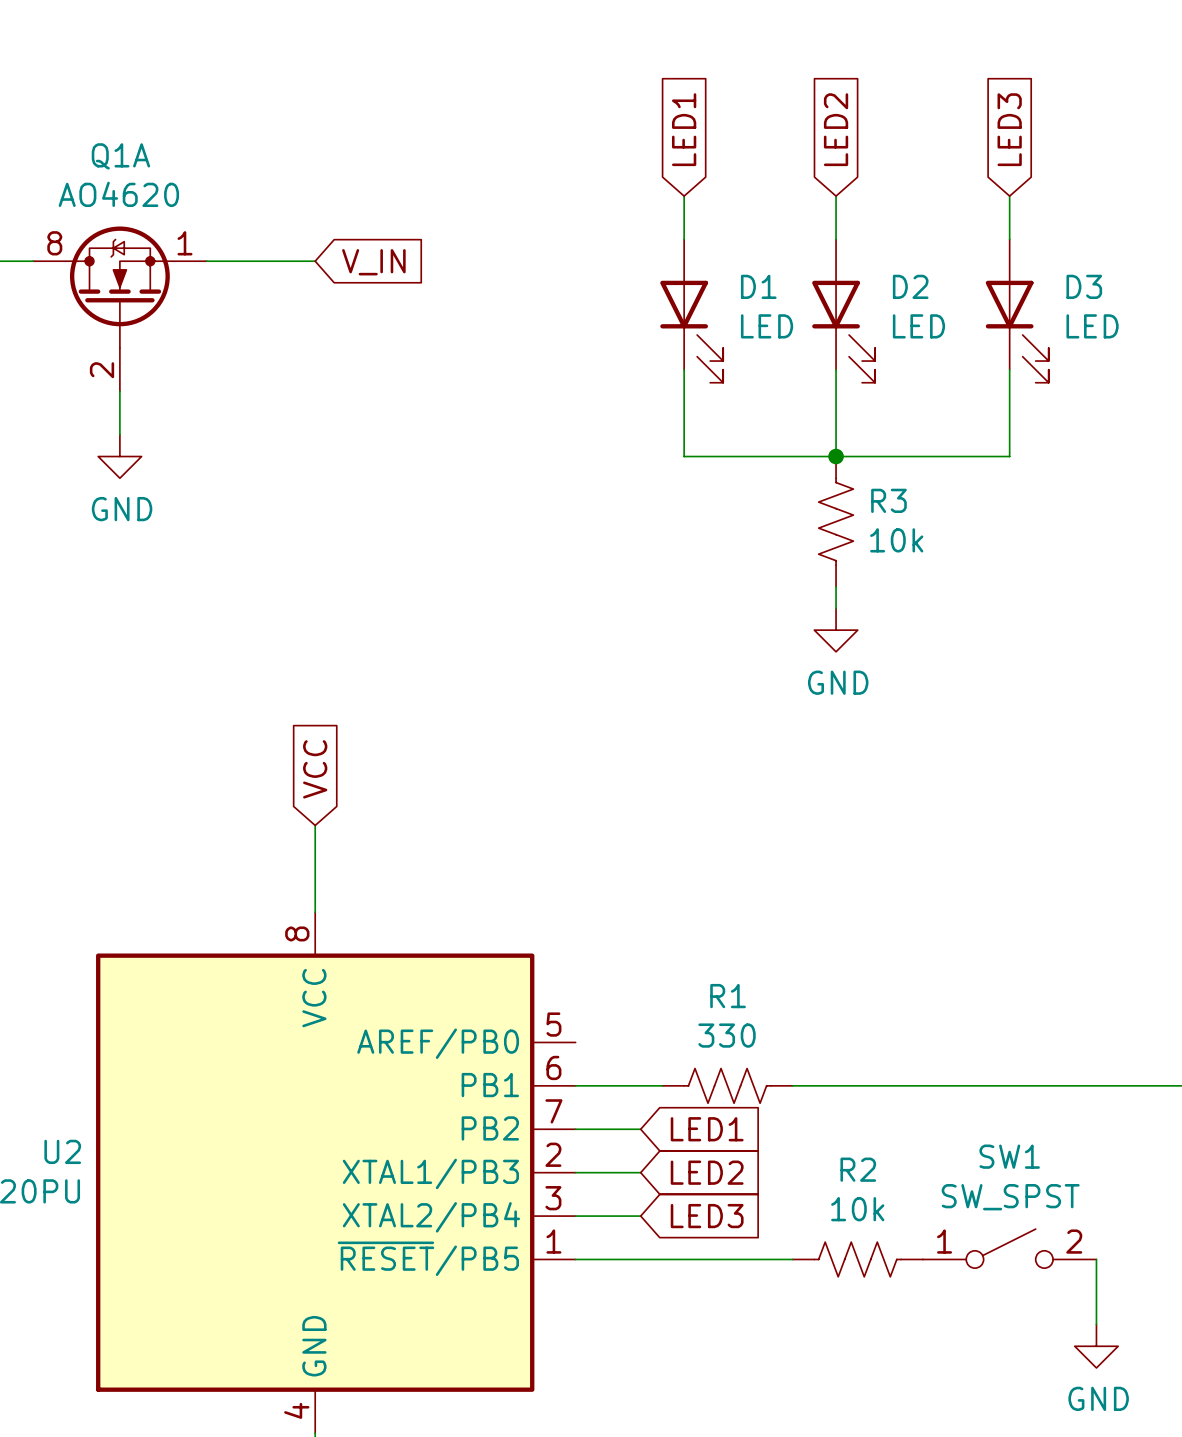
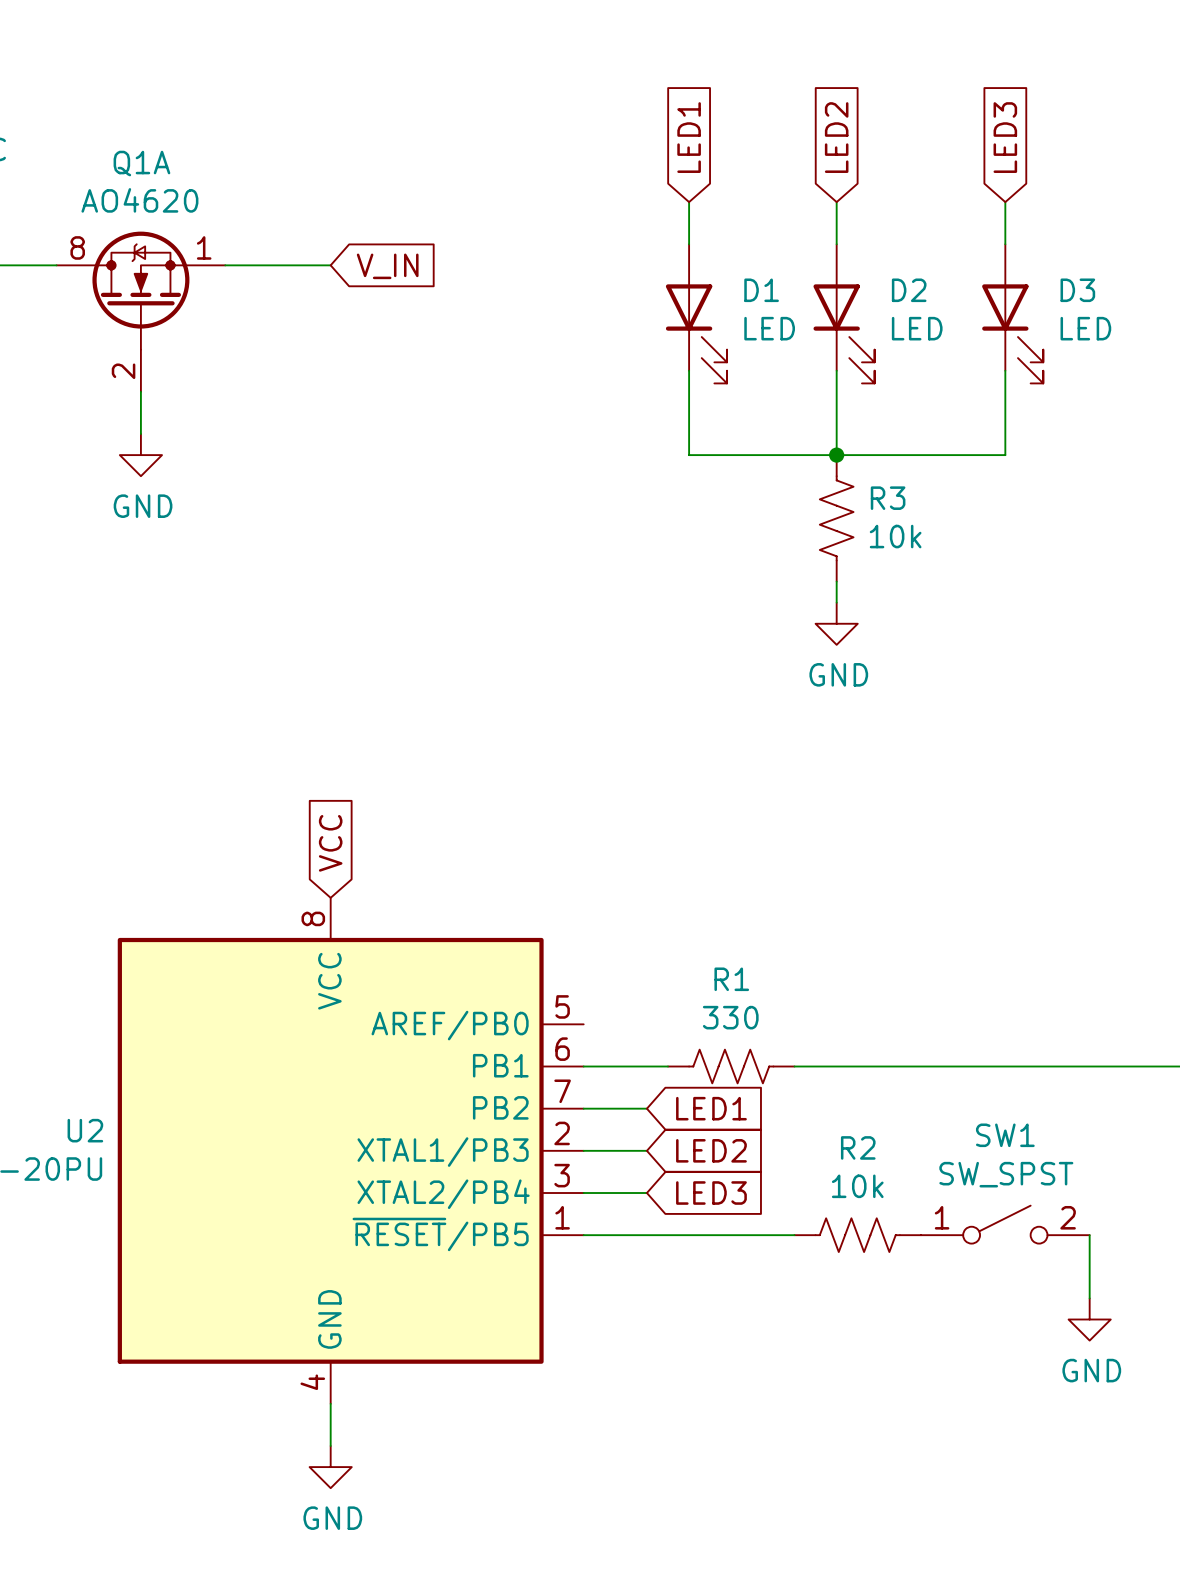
global label position: VCC (315, 769) -> VCC (330, 843)
wire: (315, 825) (315, 912) -> none

